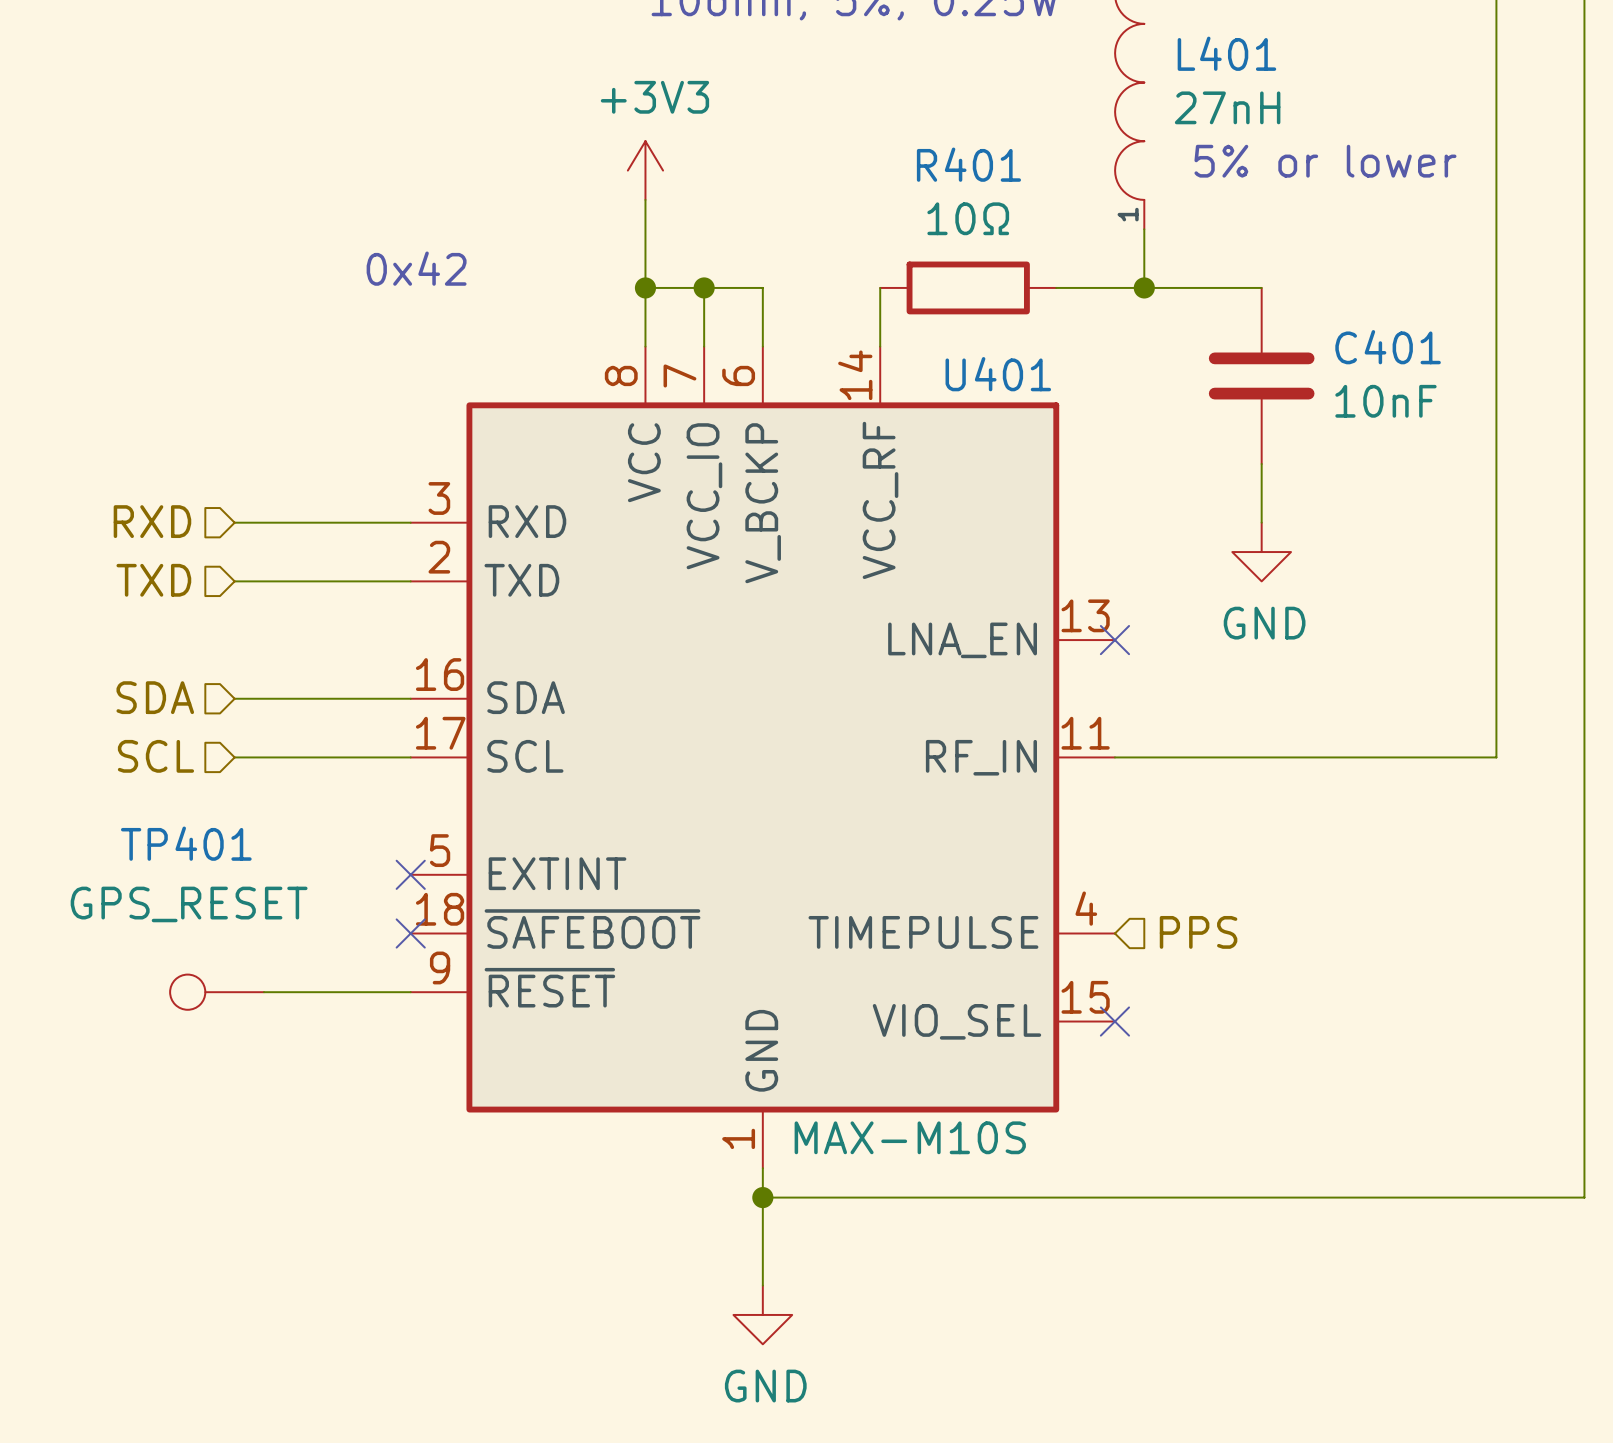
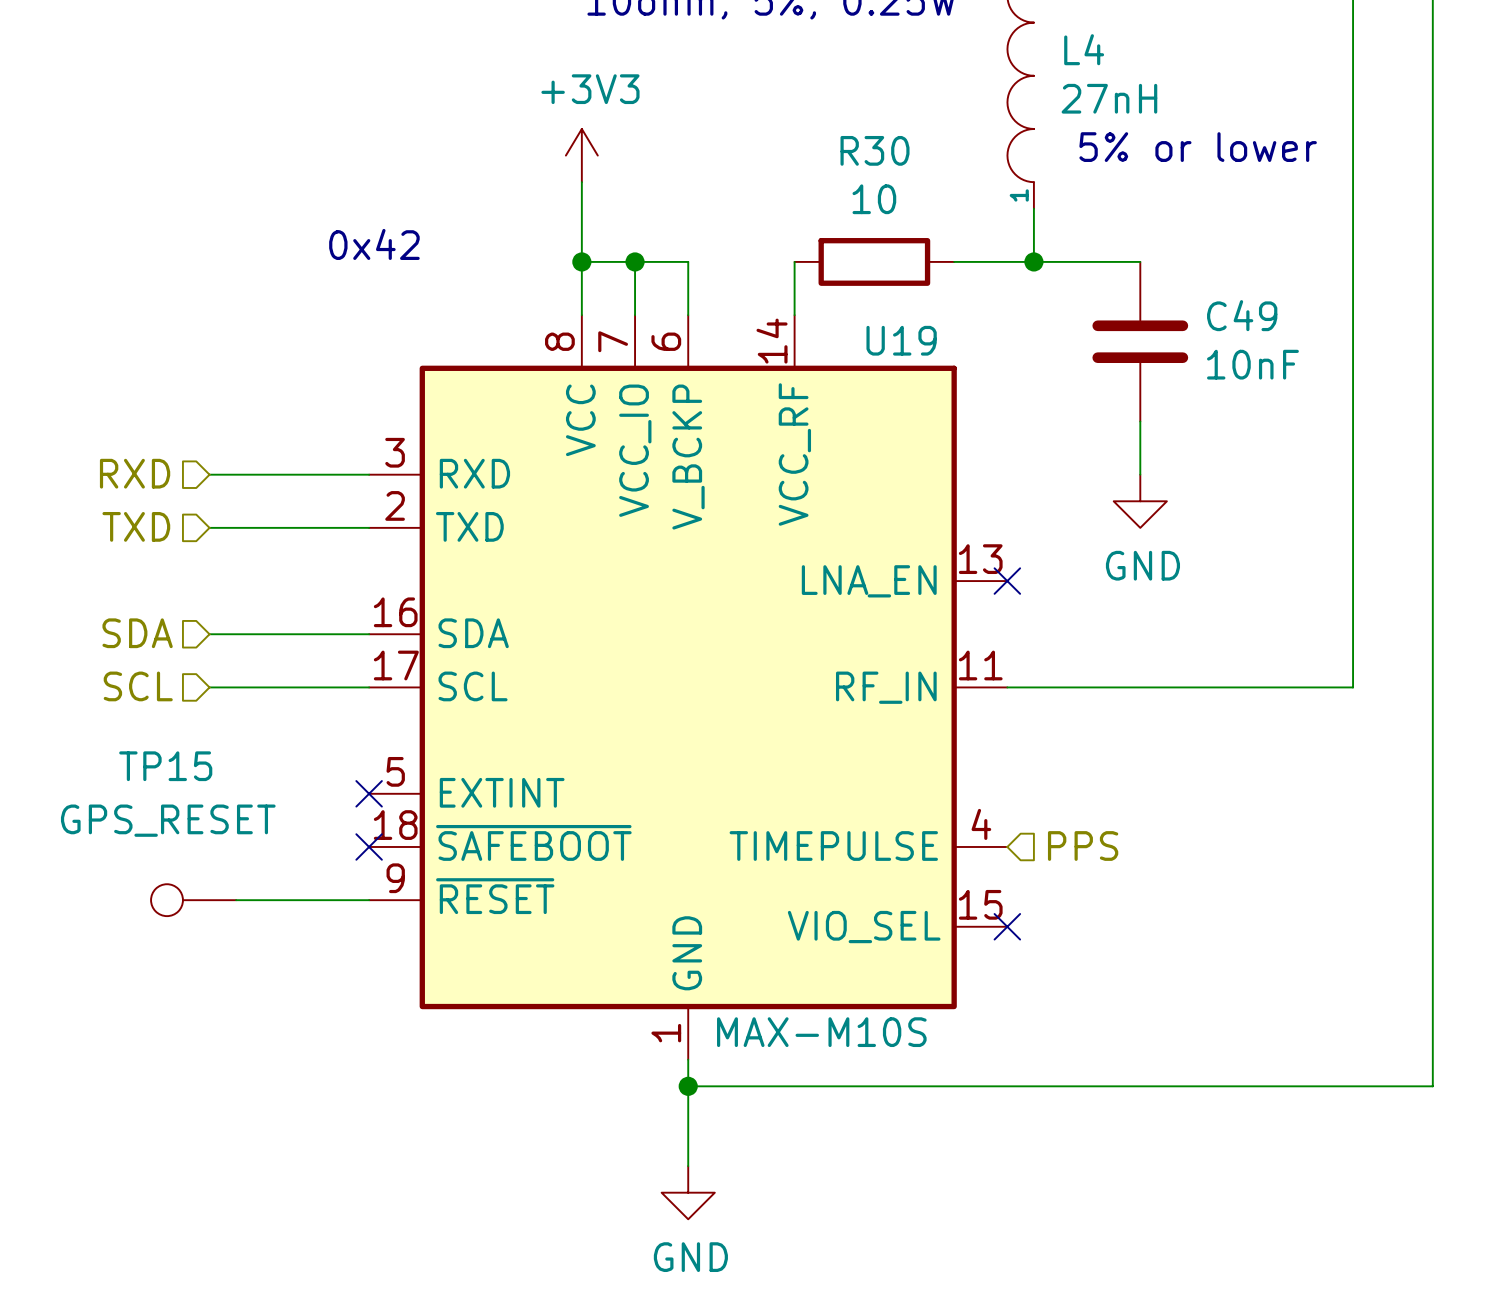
L401 name: L401 (1226, 53) -> L4 (1084, 49)
R401 name: R401 (968, 164) -> R30 (875, 150)
R401 value: 10Ω (968, 218) -> 10 (874, 199)
C401 name: C401 (1388, 347) -> C49 (1242, 315)
U401 name: U401 (998, 374) -> U19 (901, 340)
TP401 name: TP401 (186, 843) -> TP15 (165, 766)

